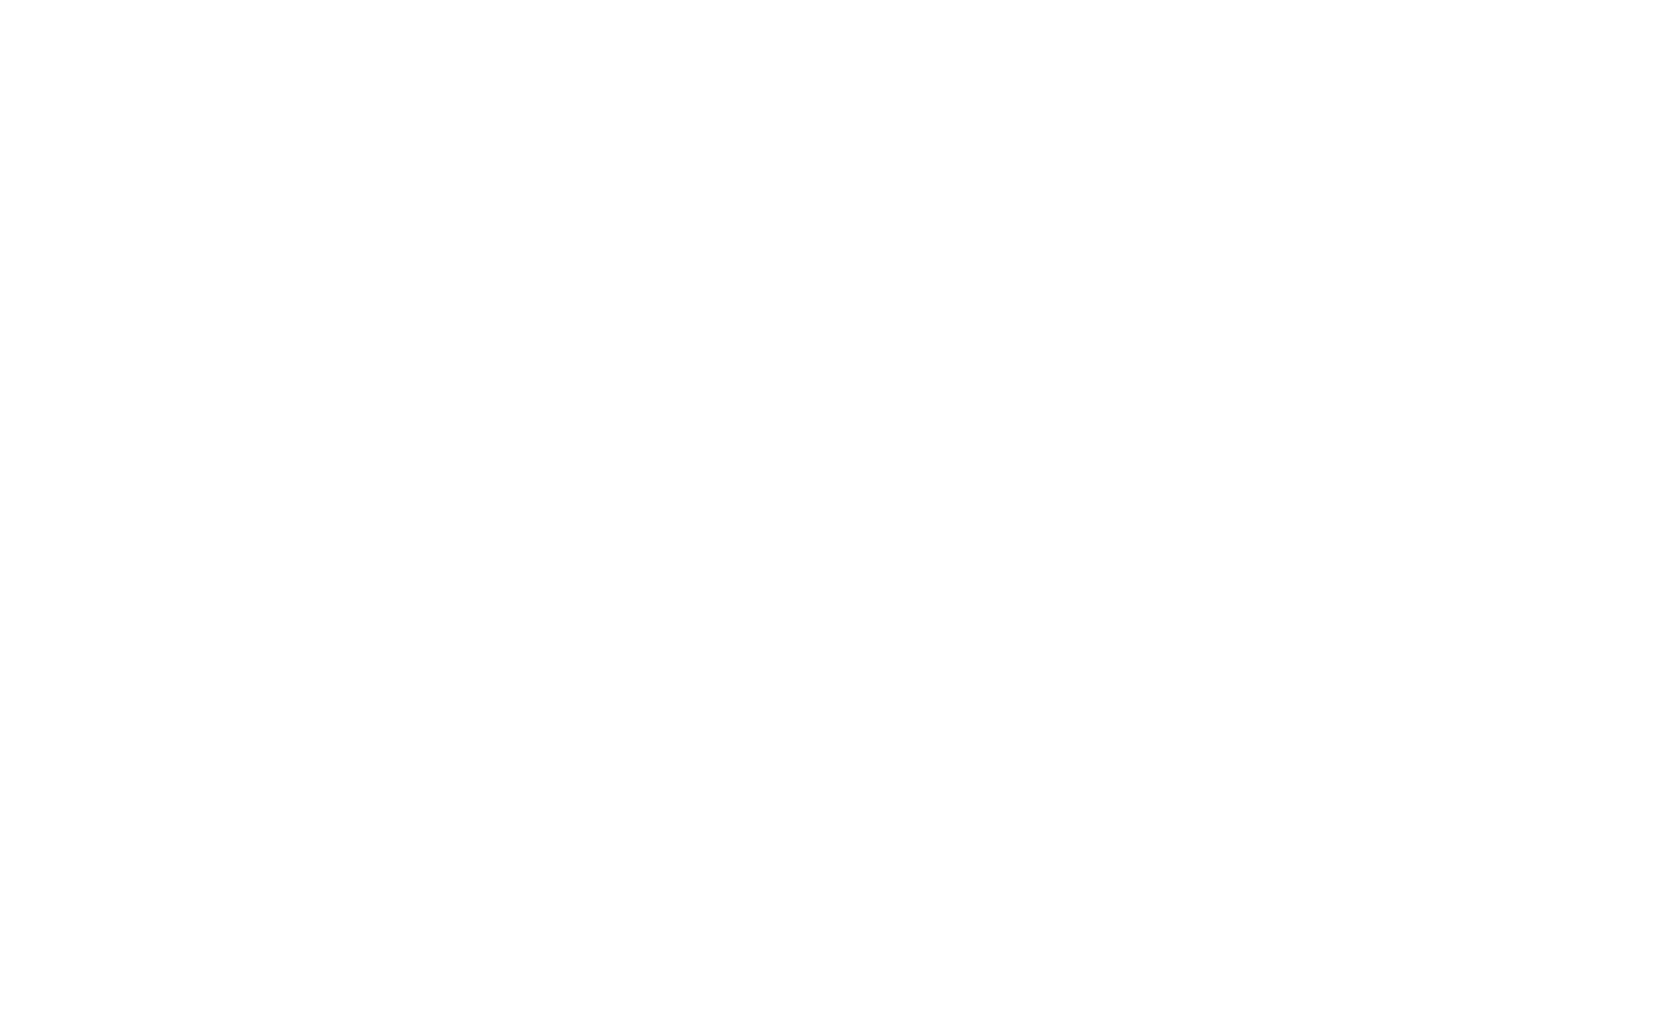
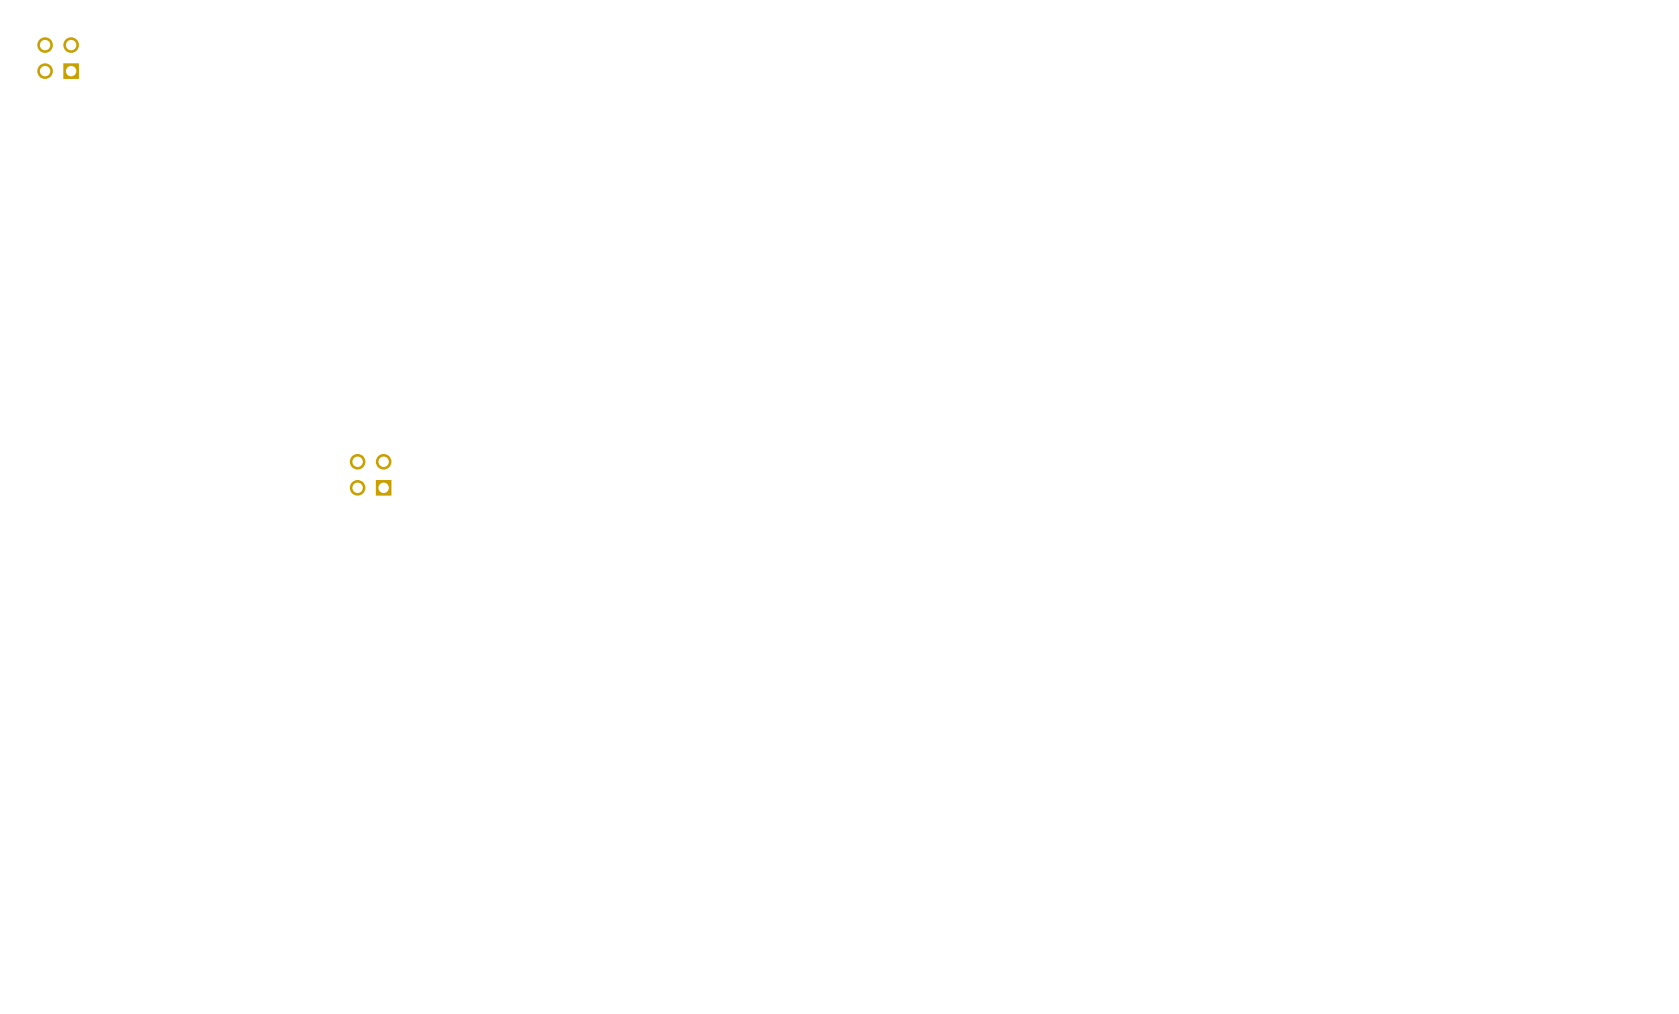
part: none -> (58, 58)
part: none -> (370, 474)

